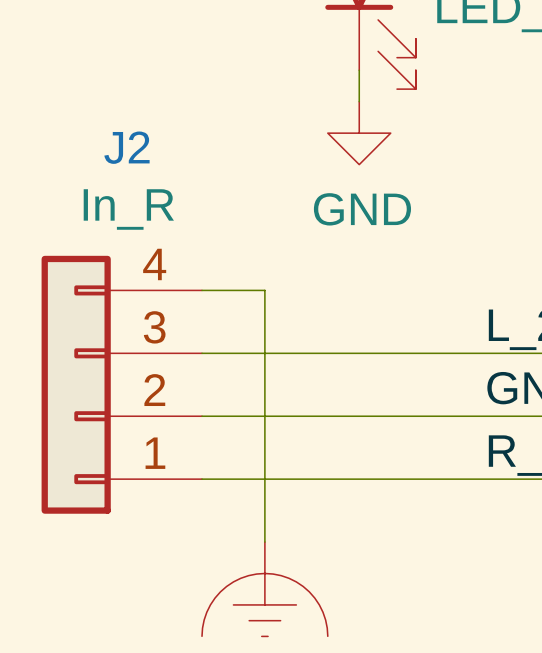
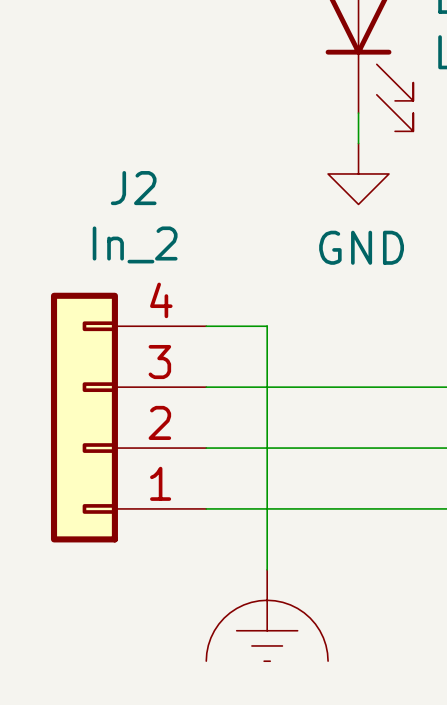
J2 value: In_R (128, 209) -> In_2 (135, 244)

